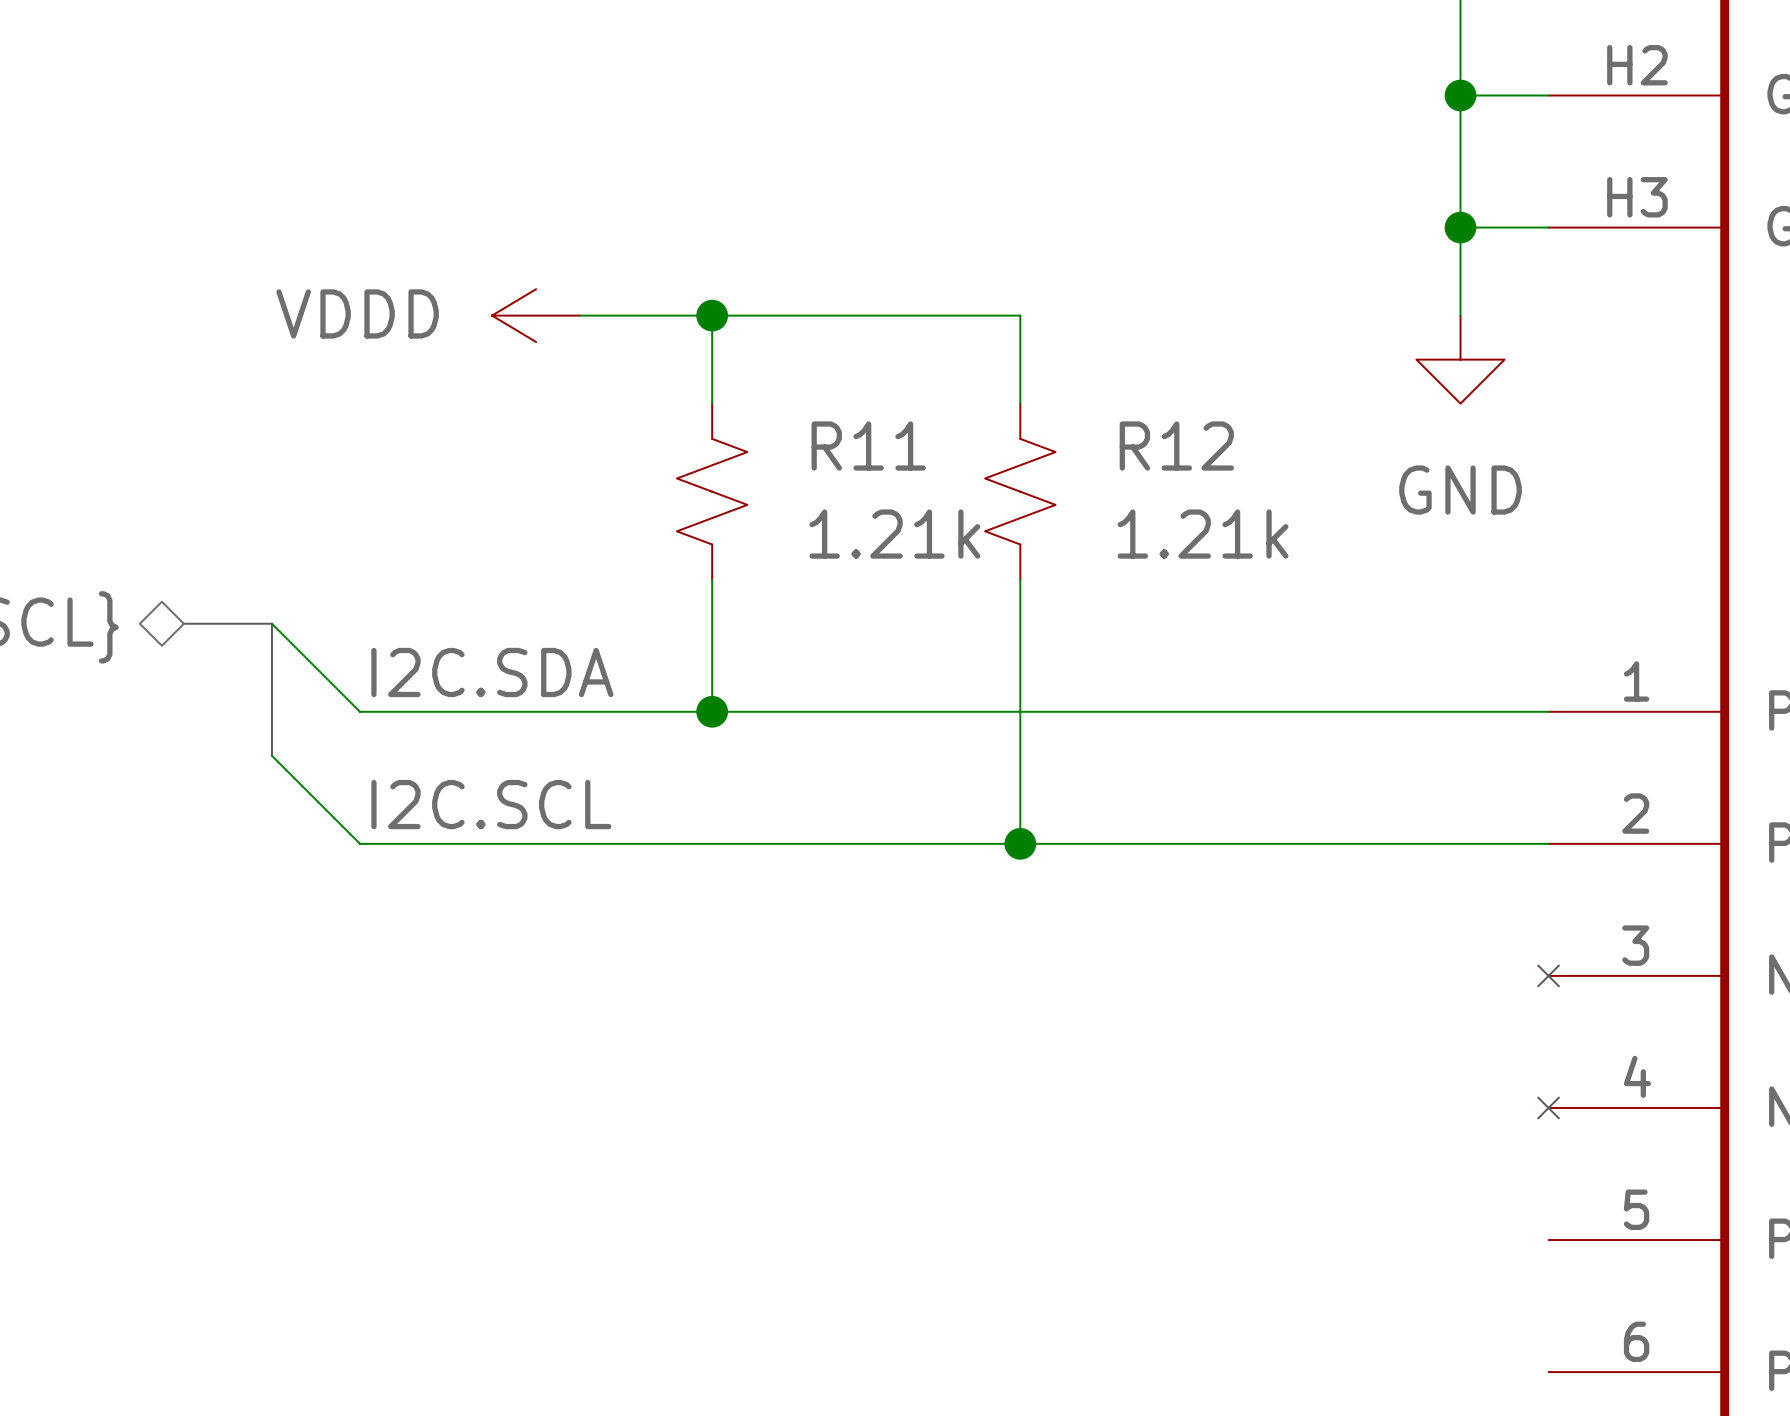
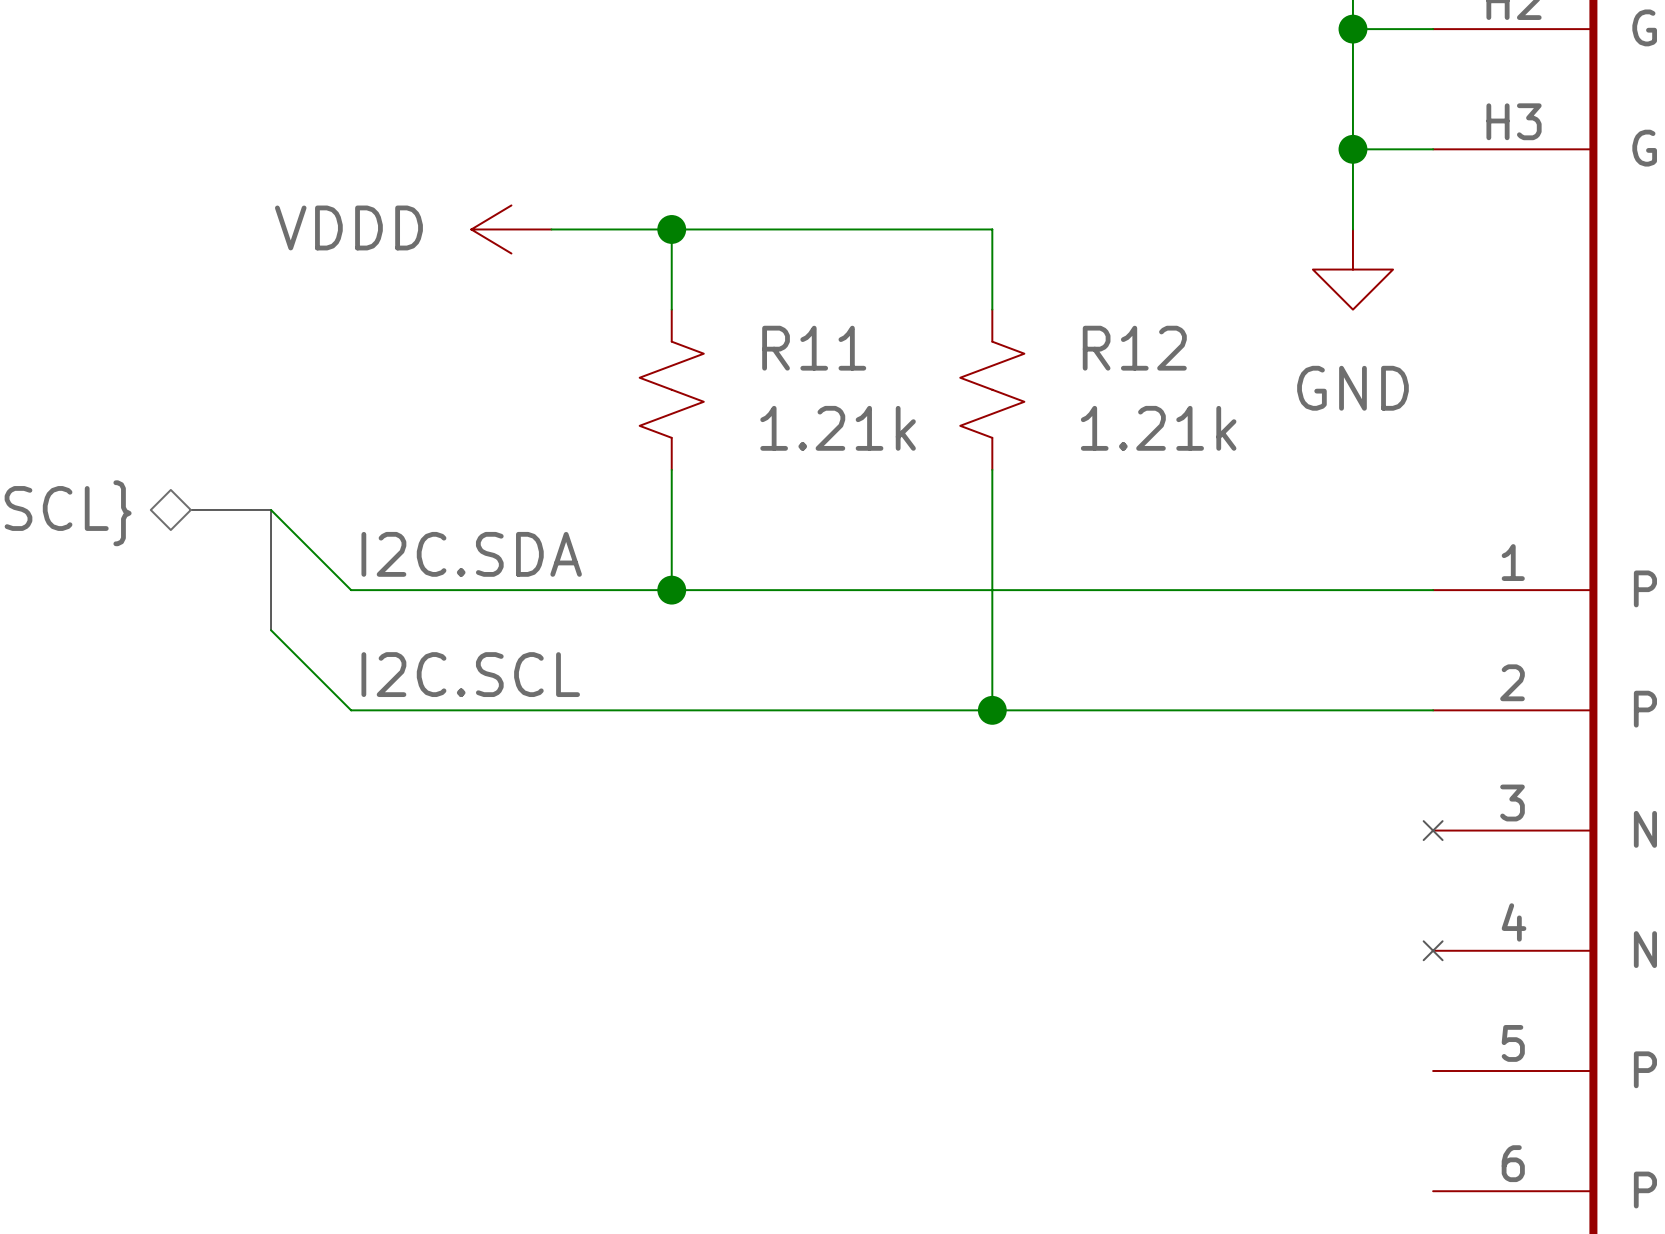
wire: (1020, 315) (1020, 403) -> (952, 229) (992, 229) (992, 309)
R12 position: (1020, 491) -> (992, 389)
wire: (1020, 579) (1020, 843) -> (992, 469) (992, 710)
junction position: (1020, 843) -> (992, 710)

